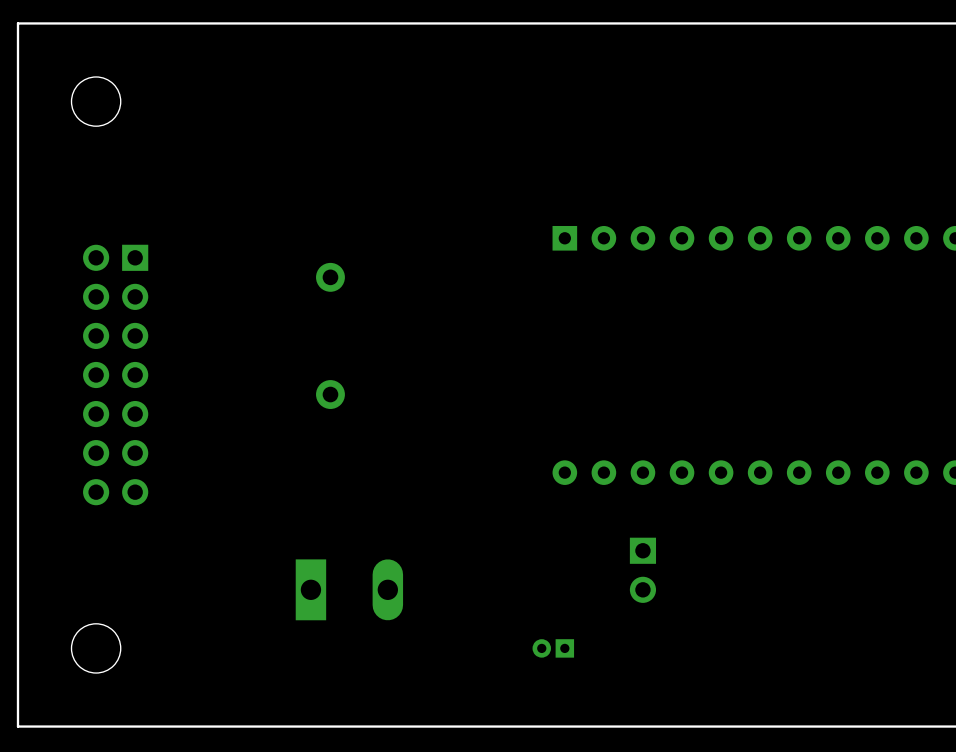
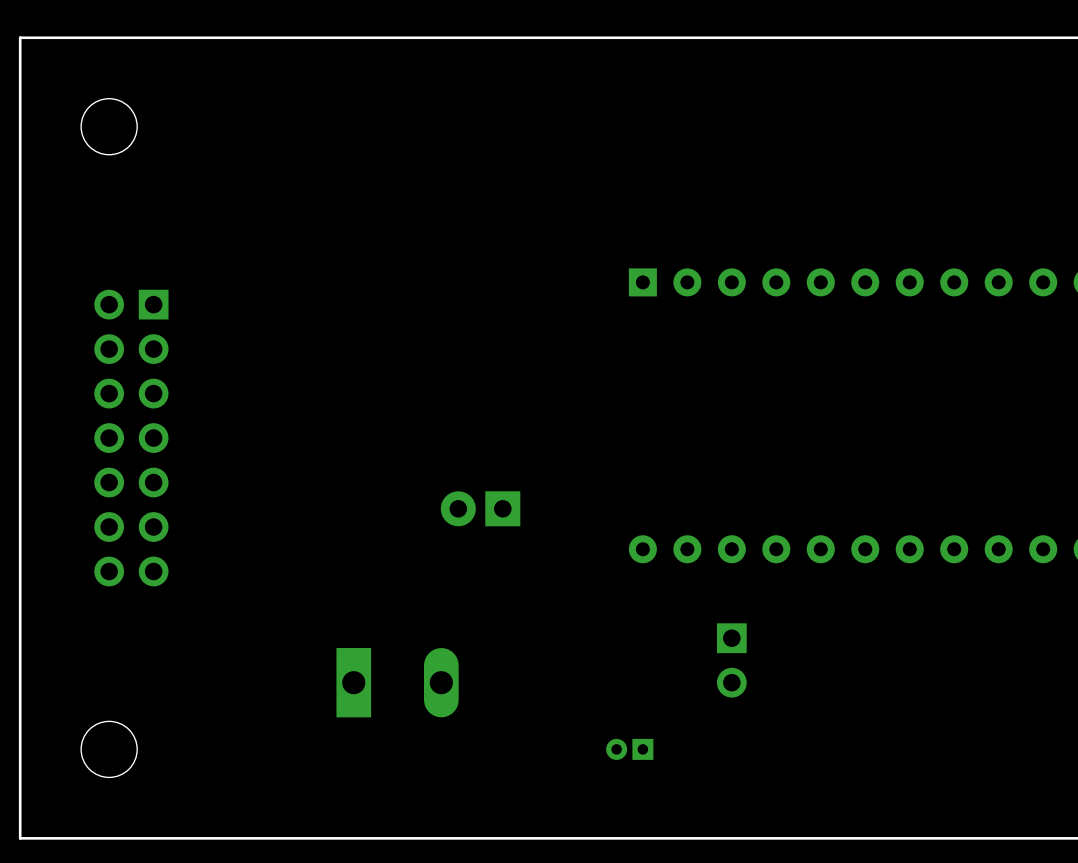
part: (330, 277) -> none
part: (330, 394) -> none
part: none -> (480, 508)

